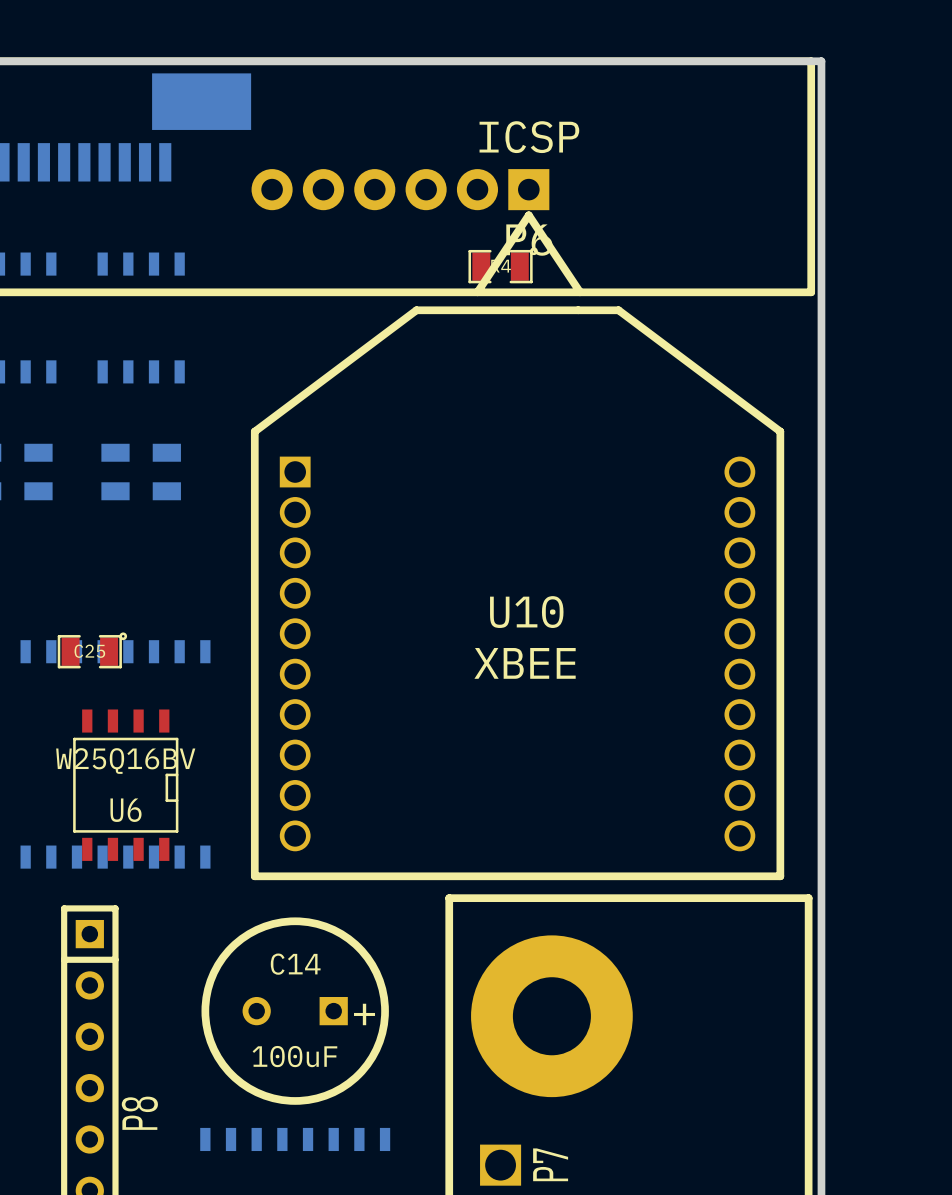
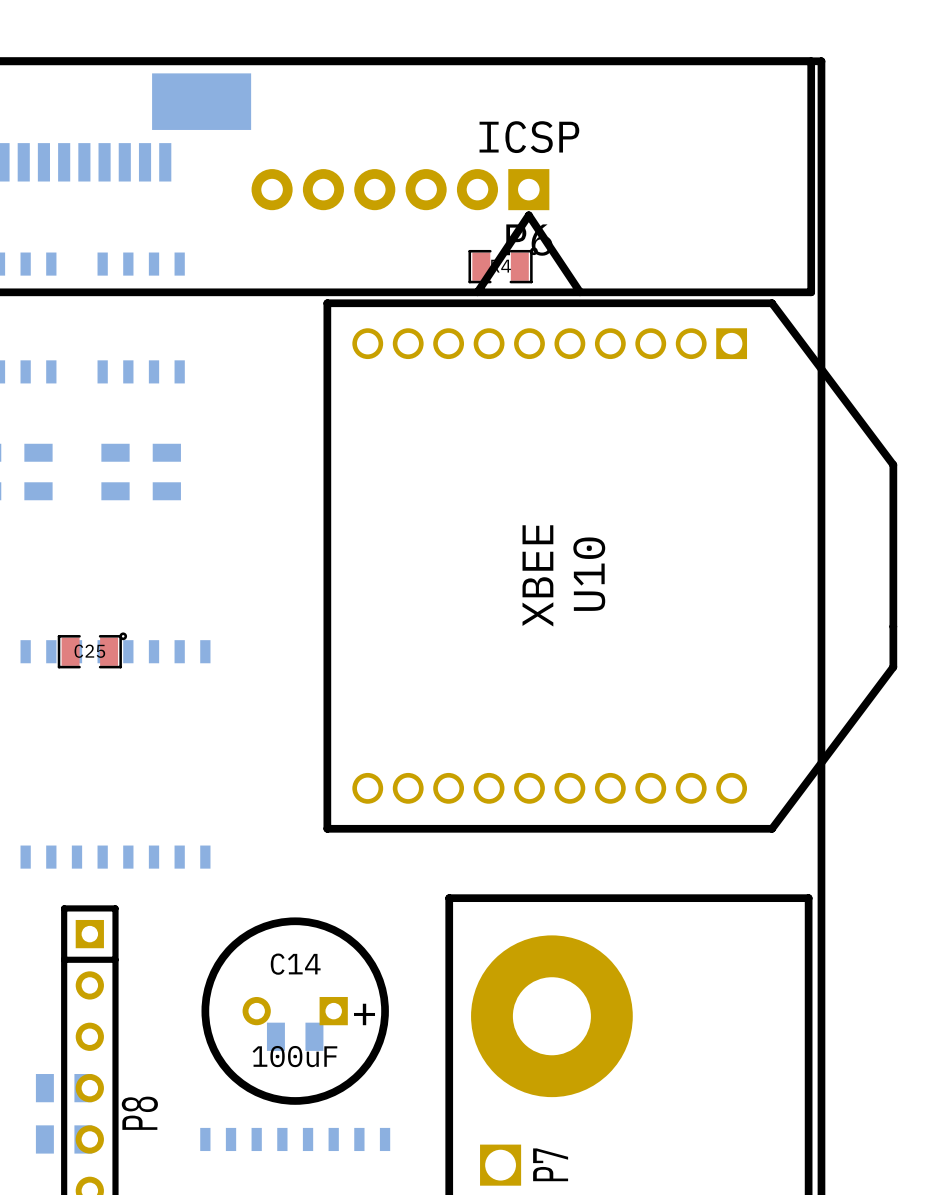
U10 rotation: 0° (517, 593) -> 90° clockwise (610, 566)
U6: W25Q16BV (125, 785) -> none
part: none -> (295, 1036)
part: none -> (64, 1088)
part: none -> (64, 1139)

